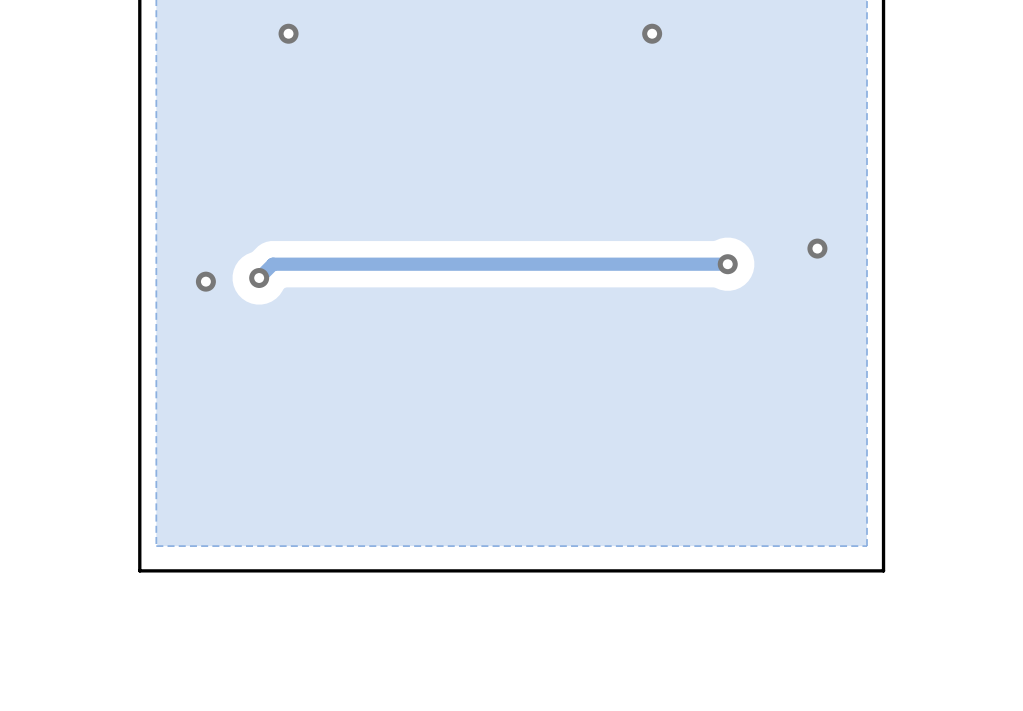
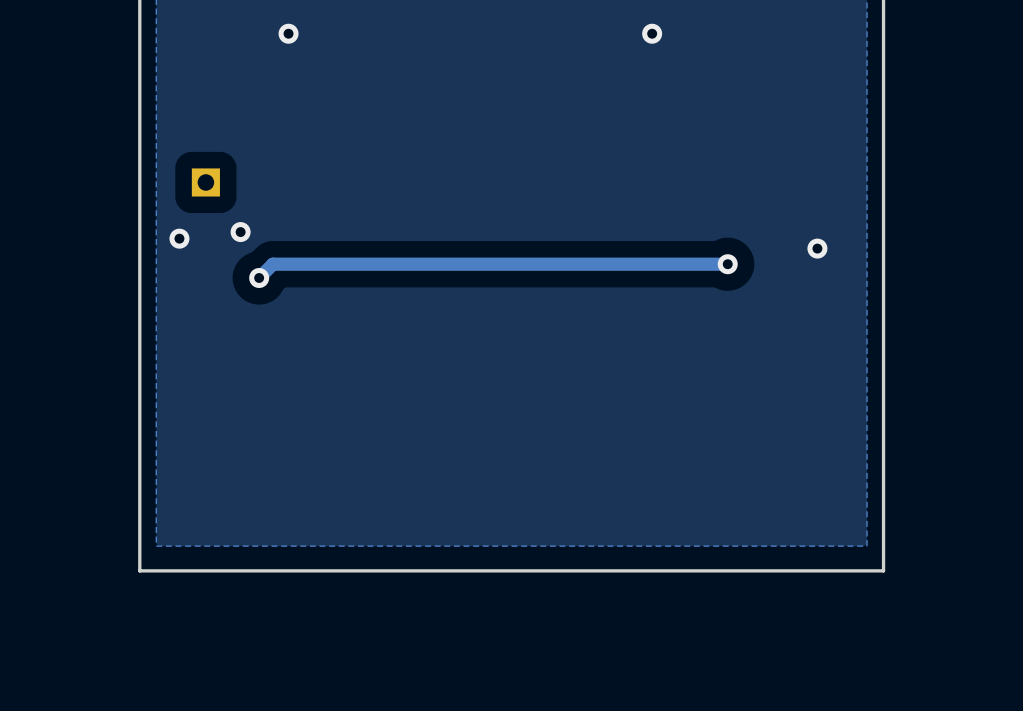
part: none -> (205, 182)
via: none -> (240, 232)
via: none -> (179, 238)
via: (205, 281) -> none

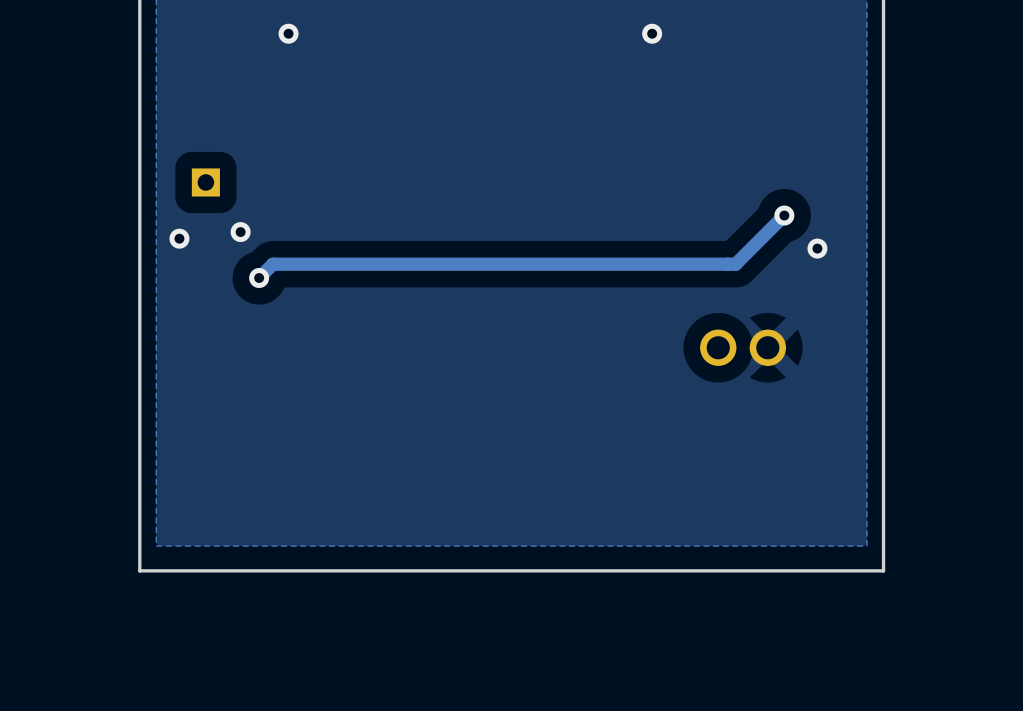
track: none -> (784, 215) (735, 264) (727, 264)
via position: (727, 264) -> (784, 215)
part: none -> (743, 347)

